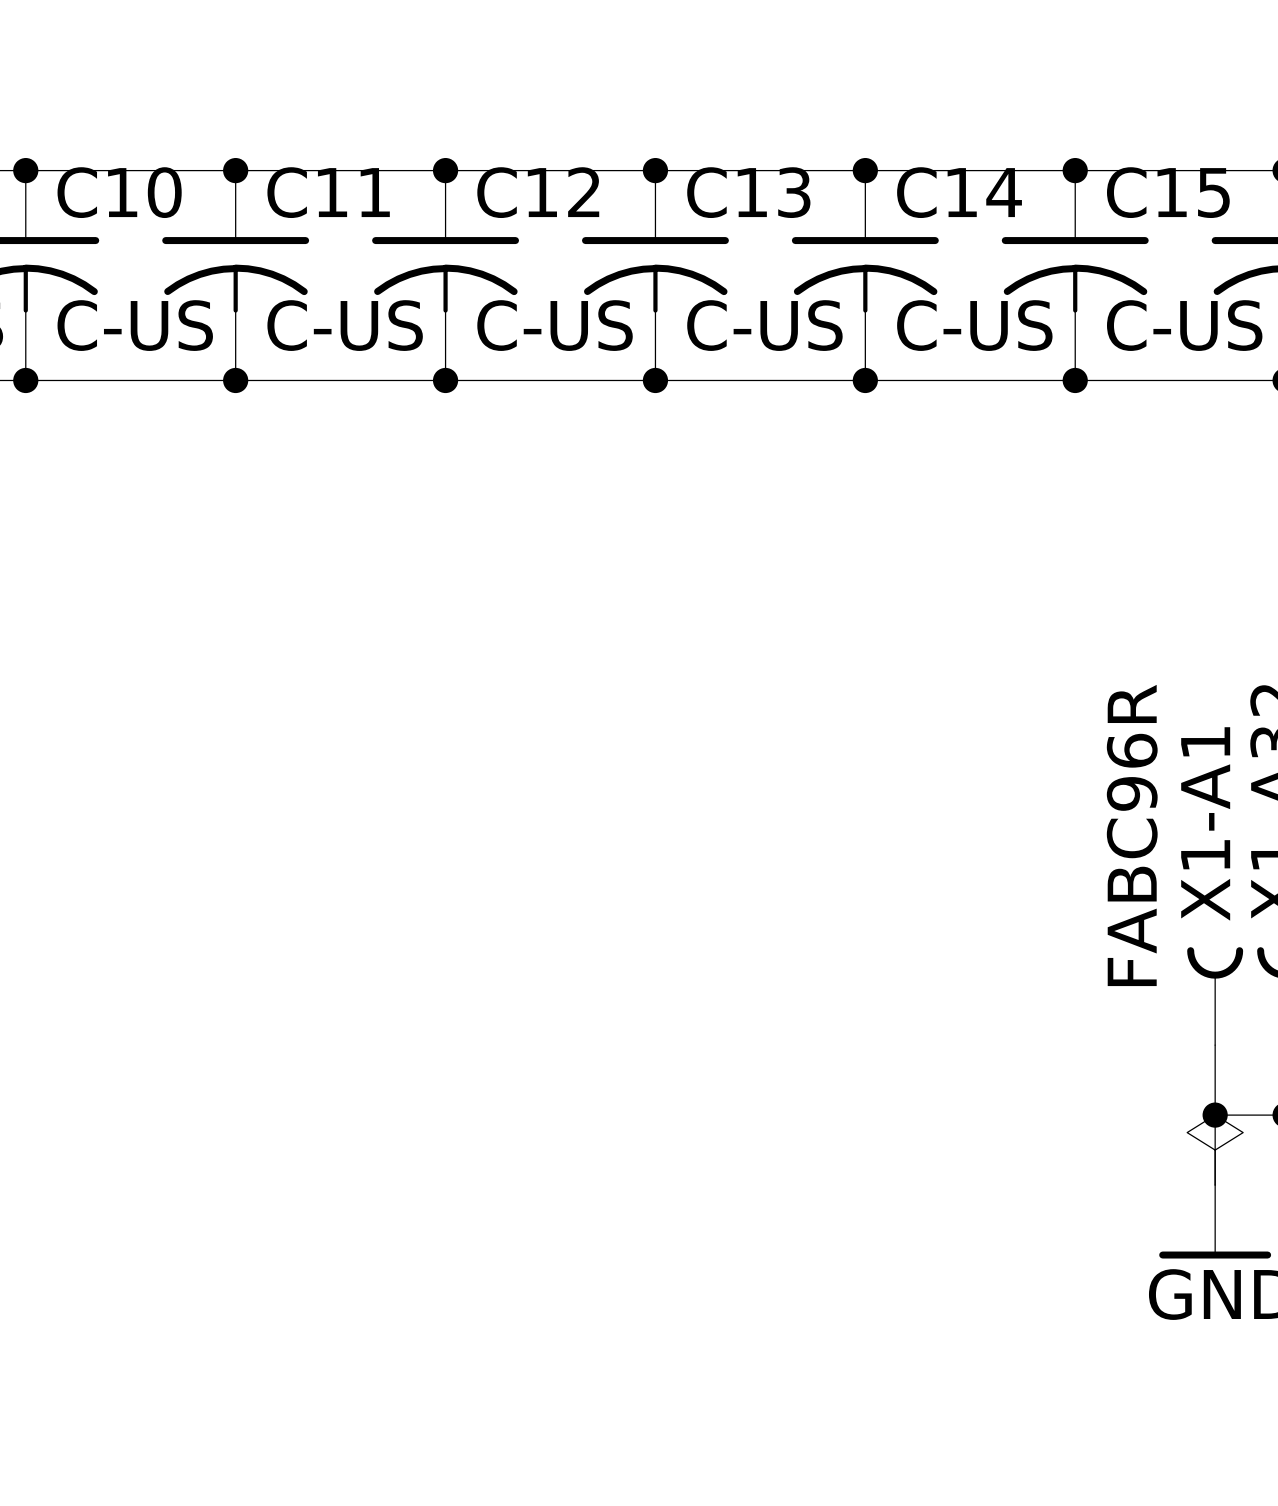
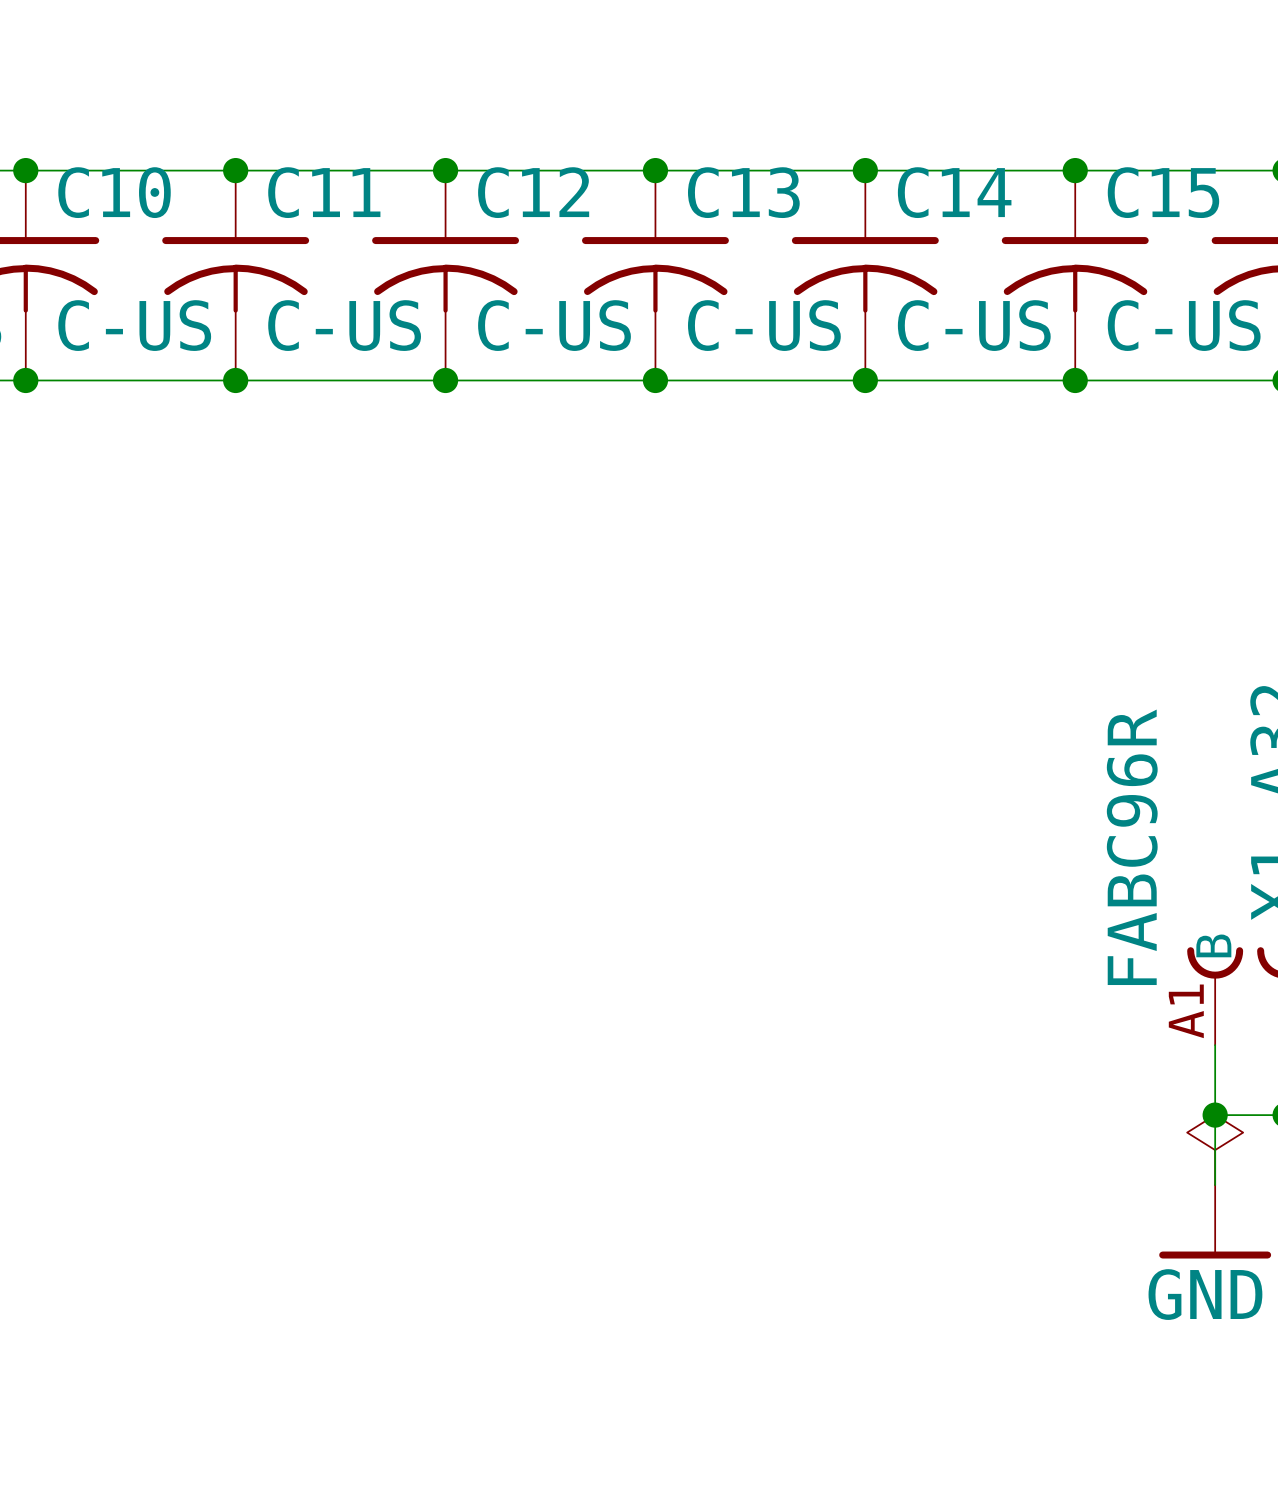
part text: X1-A1 (1205, 823) -> none
part pin name: none -> B (1213, 945)
part pin number: none -> A1 (1186, 1011)

